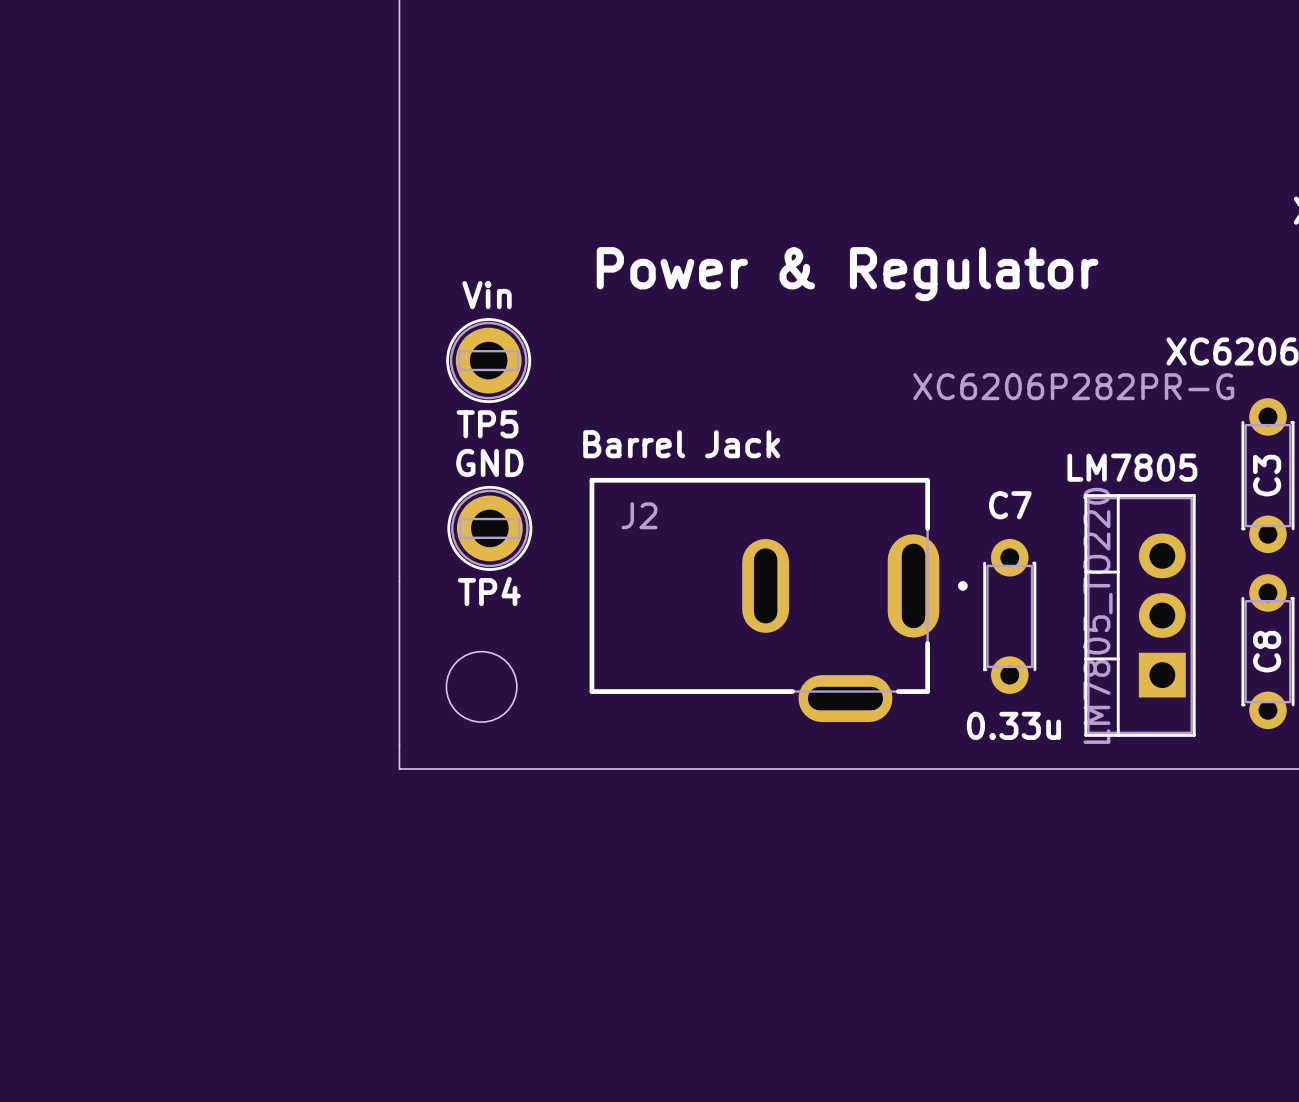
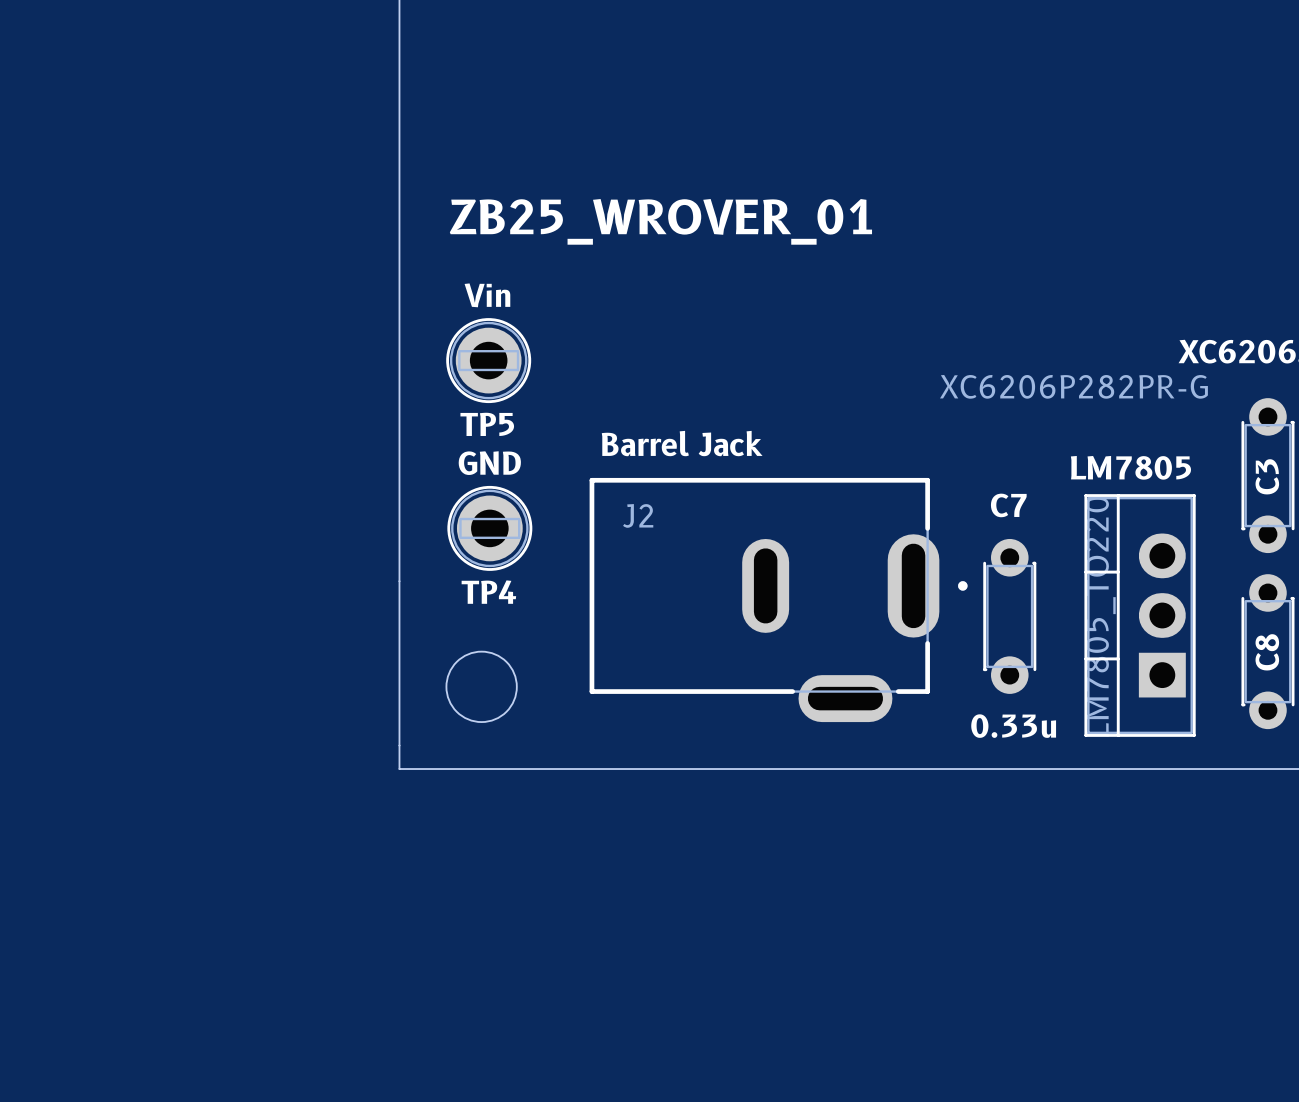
text: none -> ZB25_WROVER_01 (660, 221)
text: Power & Regulator (847, 274) -> none

